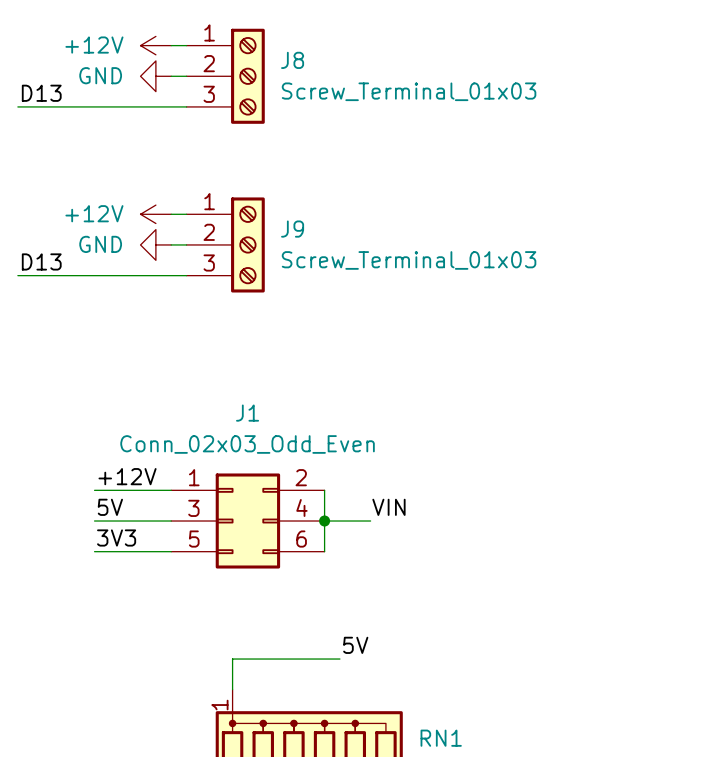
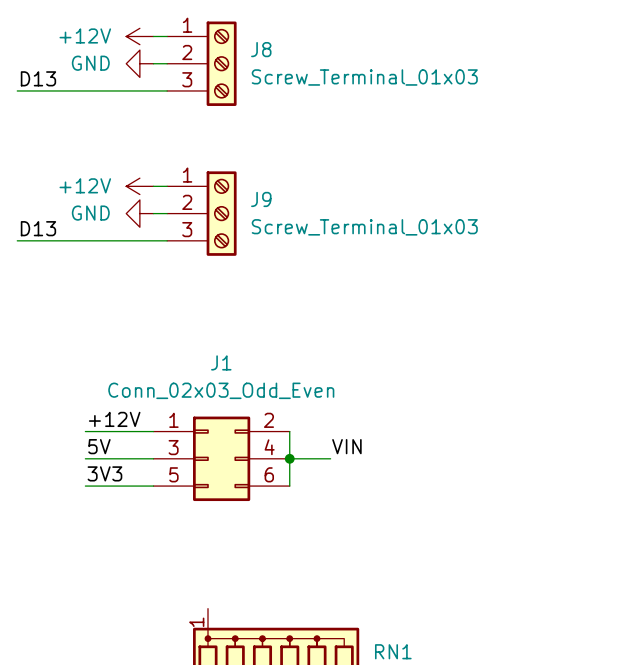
label: 5V (355, 645) -> none
wire: (339, 659) (232, 659) (232, 689) -> none

